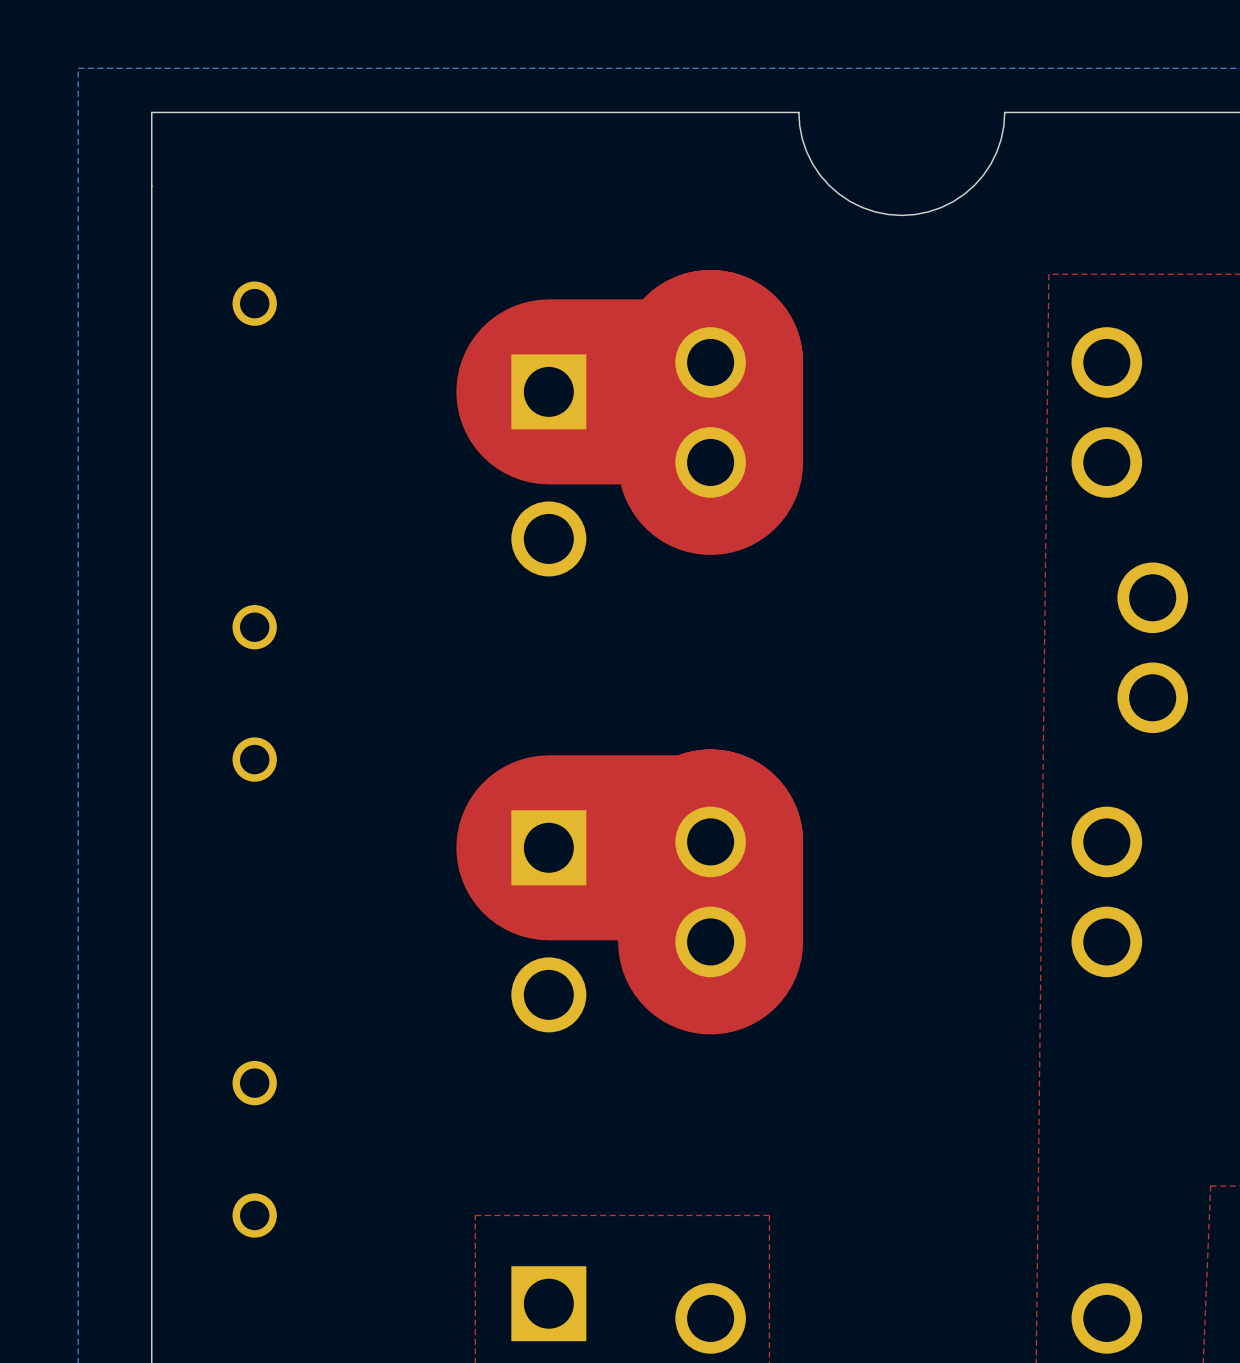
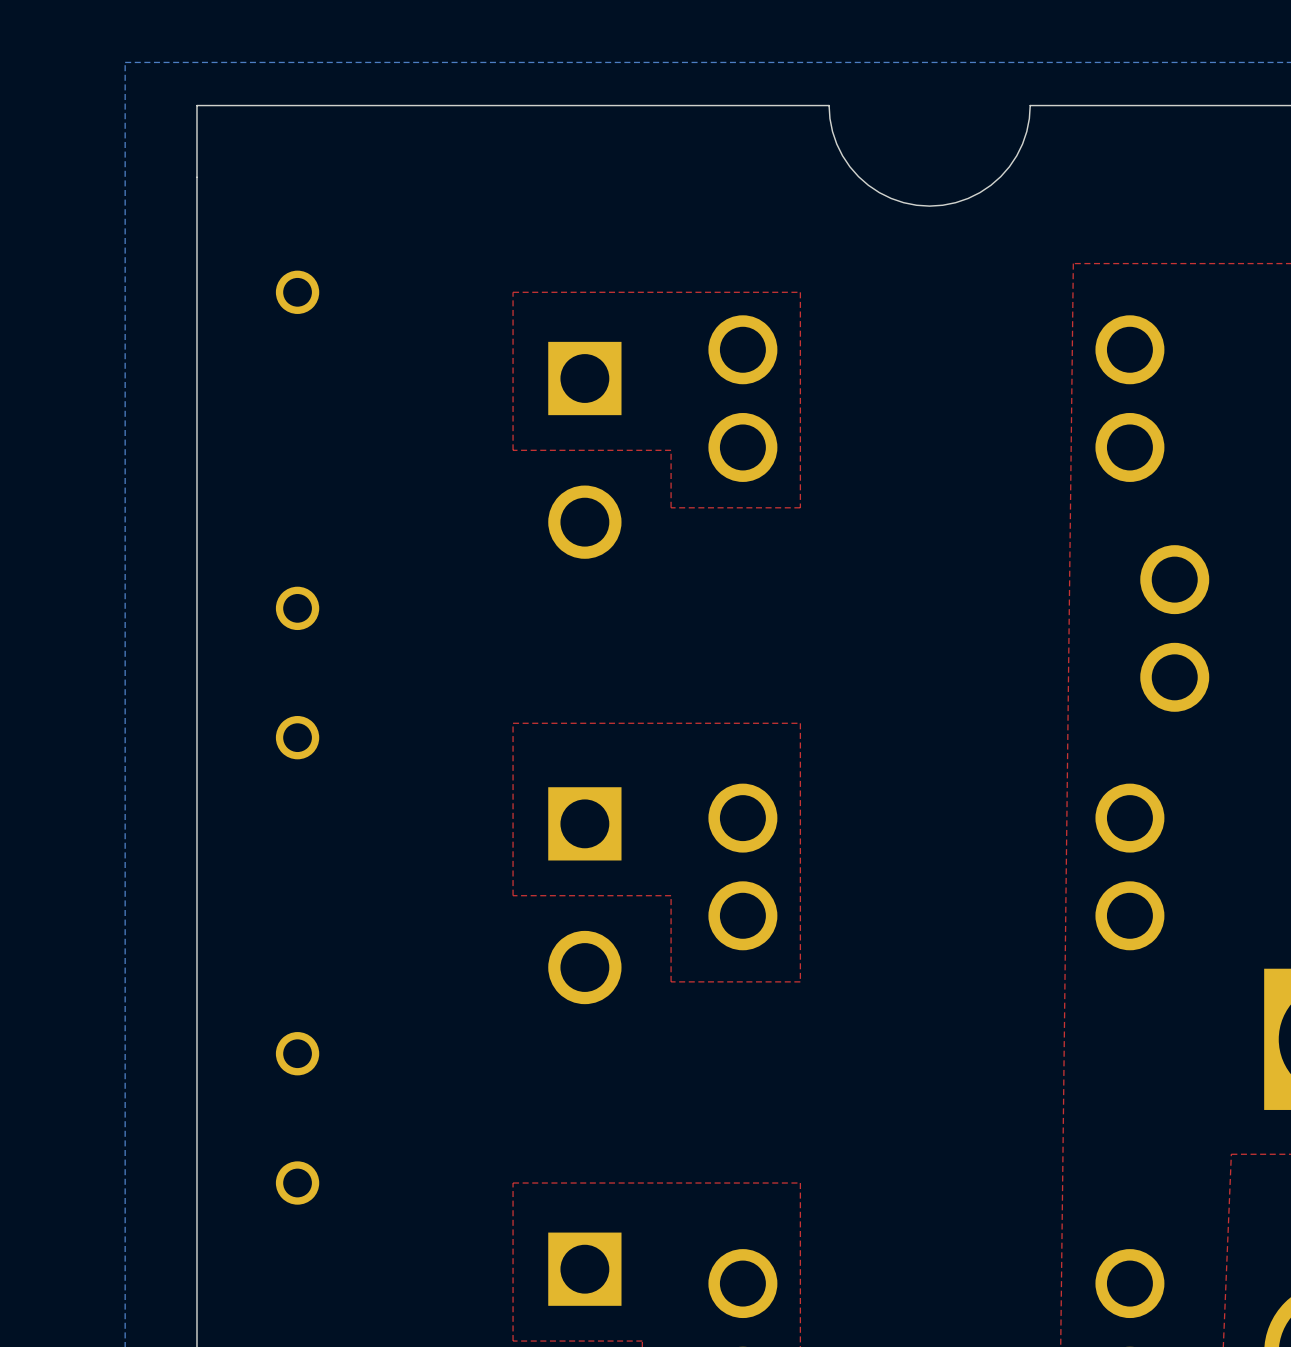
top zone outline: none -> (800, 292) (800, 507) (671, 507) (671, 450) (513, 450) (513, 292) (800, 292)
top track: (548, 391) (681, 391) (710, 362) (710, 462) -> none
top zone outline: none -> (800, 723) (800, 981) (671, 981) (671, 895) (513, 895) (513, 723) (800, 723)
top track: (548, 847) (704, 847) (710, 841) (710, 941) -> none

